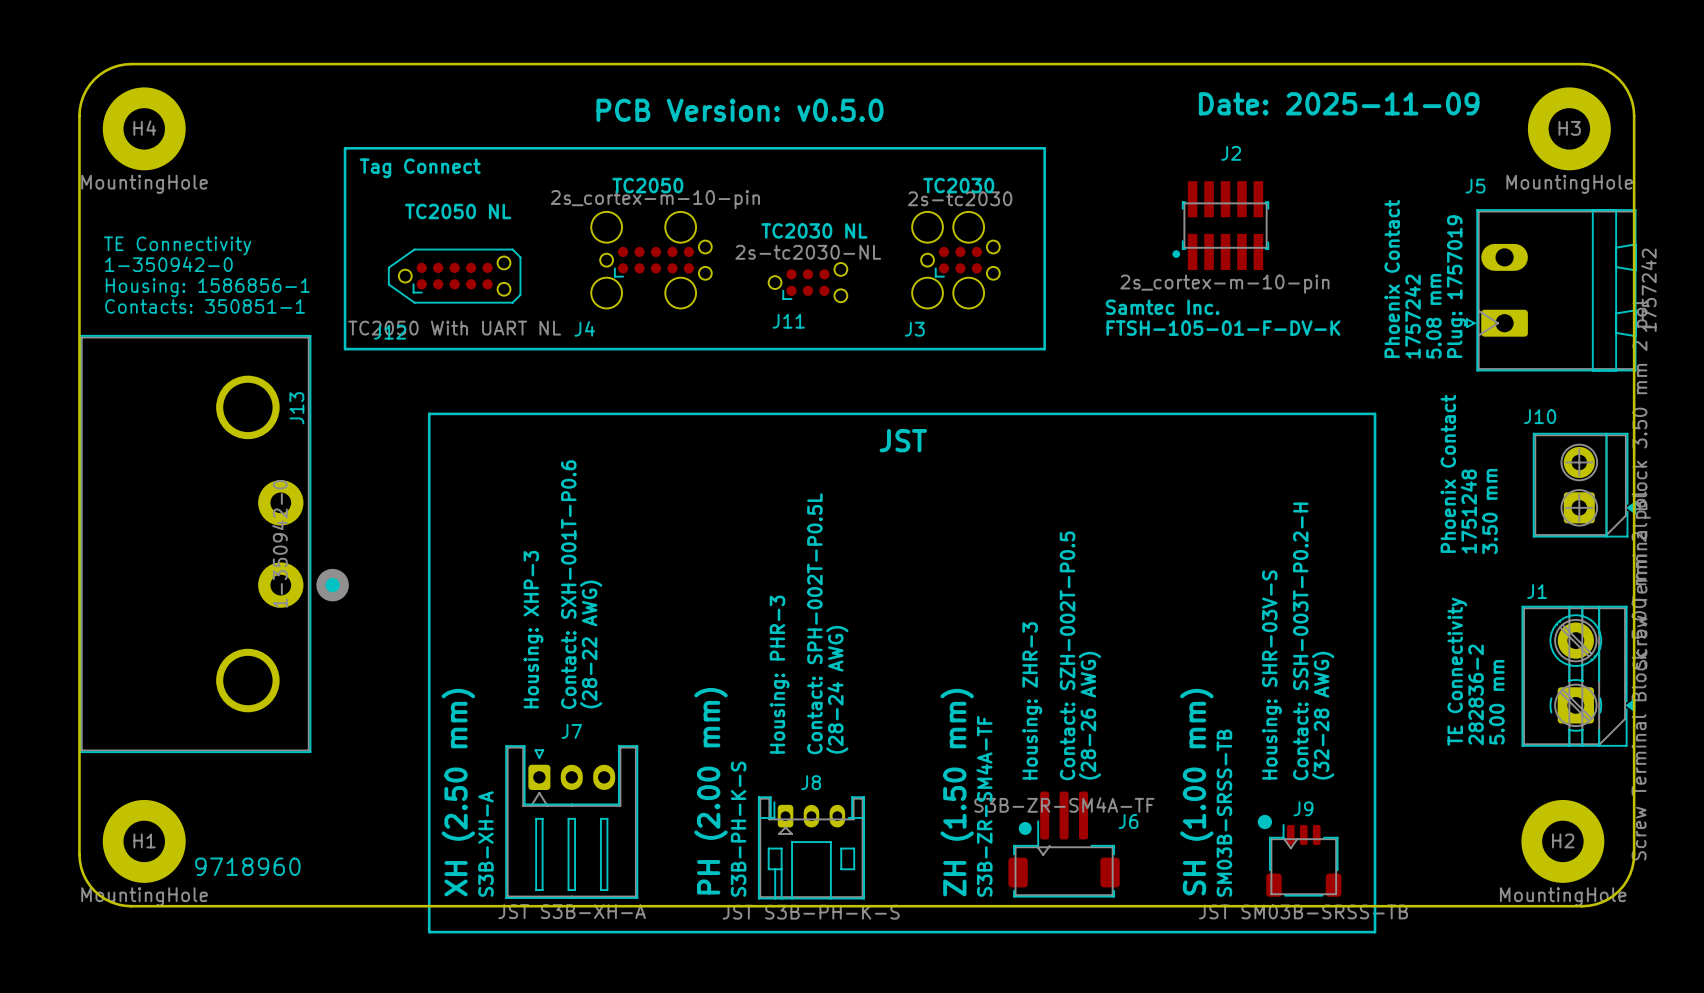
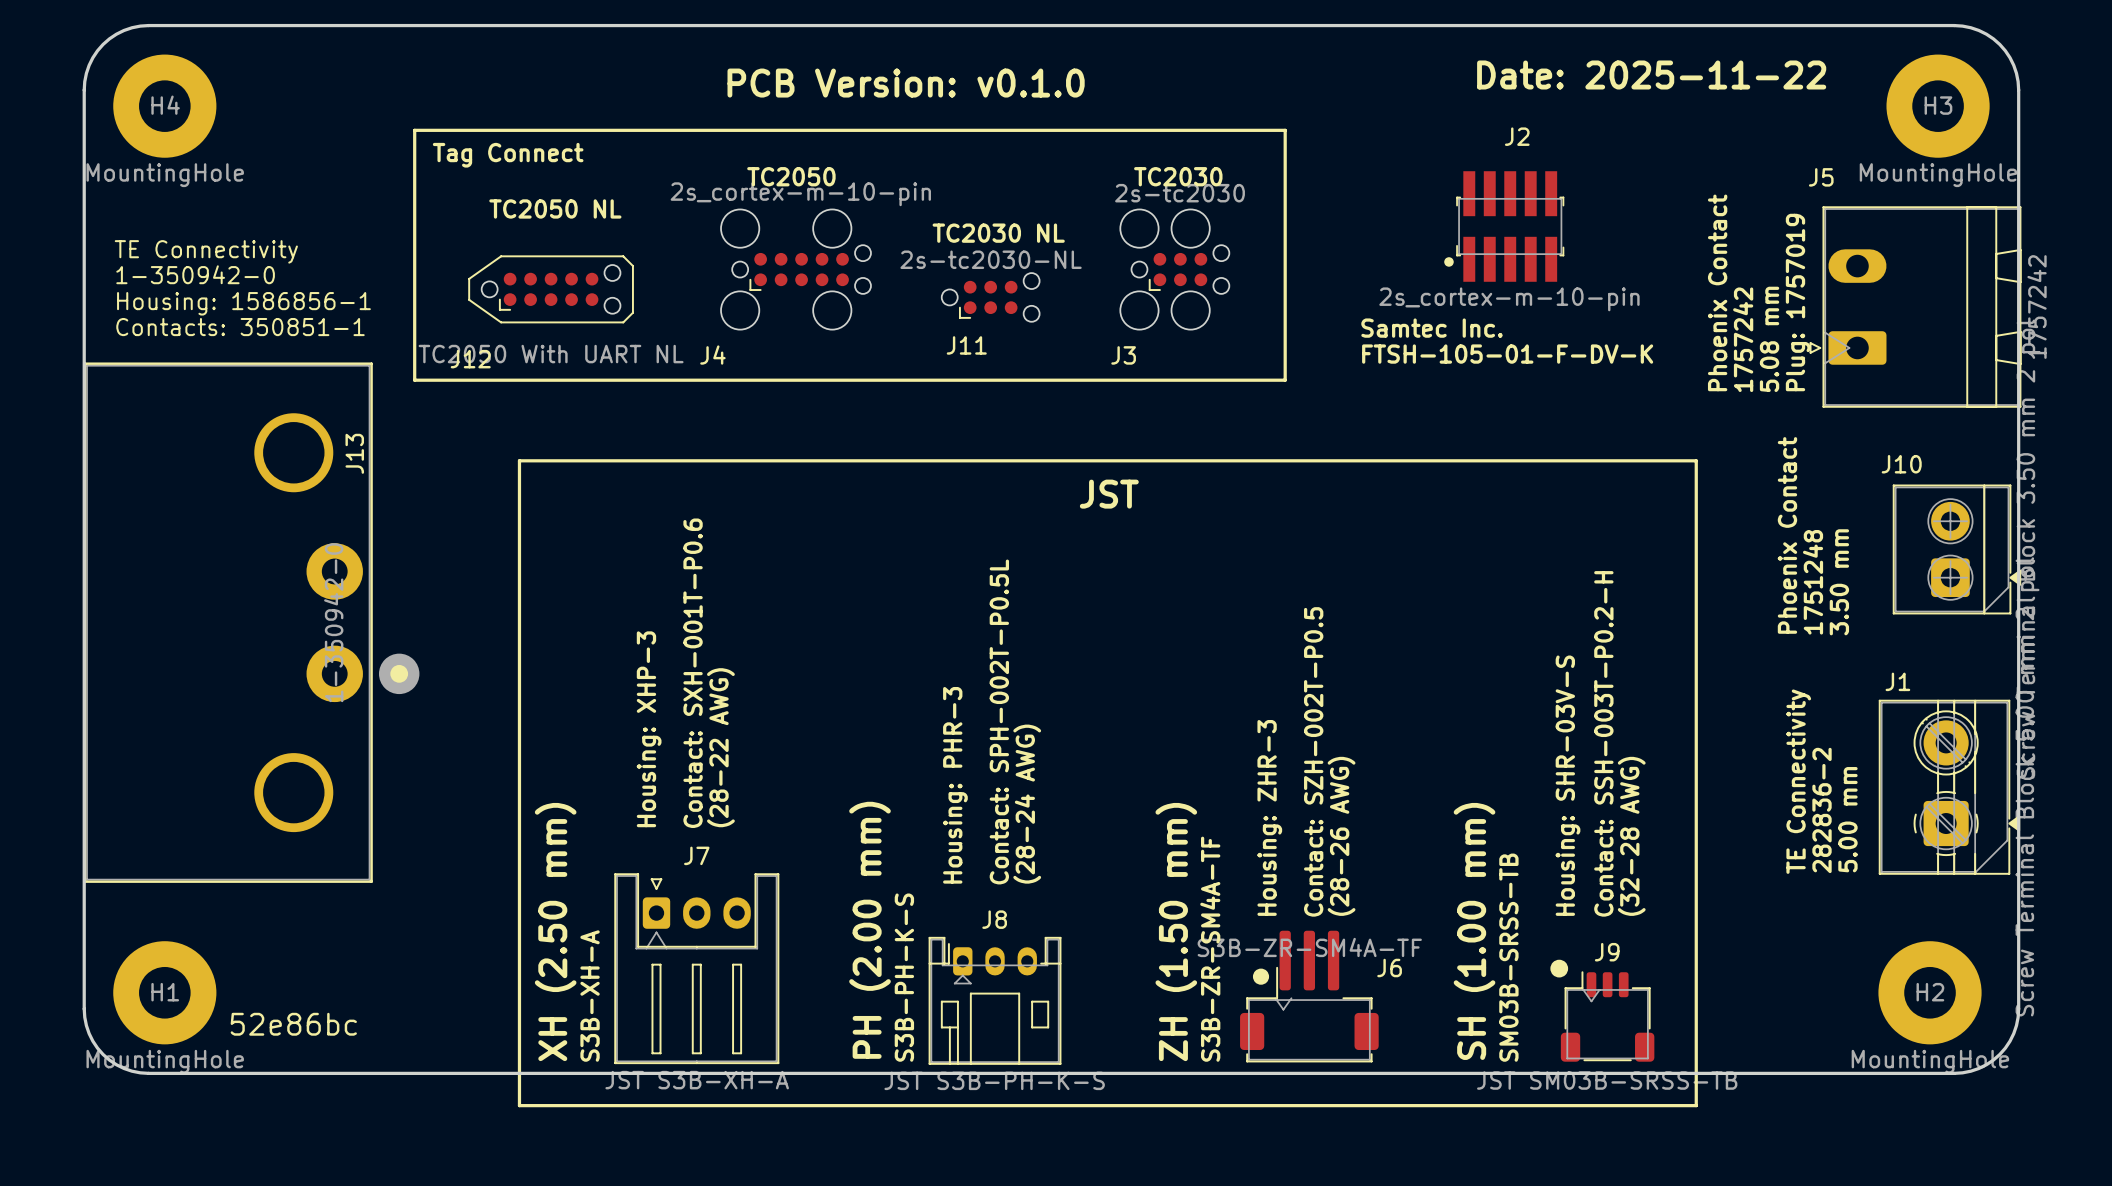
text: Date: 2025-11-09 (1339, 103) -> Date: 2025-11-22 (1651, 74)
text: PCB Version: v0.5.0 (739, 110) -> PCB Version: v0.1.0 (906, 83)
text: 9718960 (247, 866) -> 52e86bc (293, 1024)

